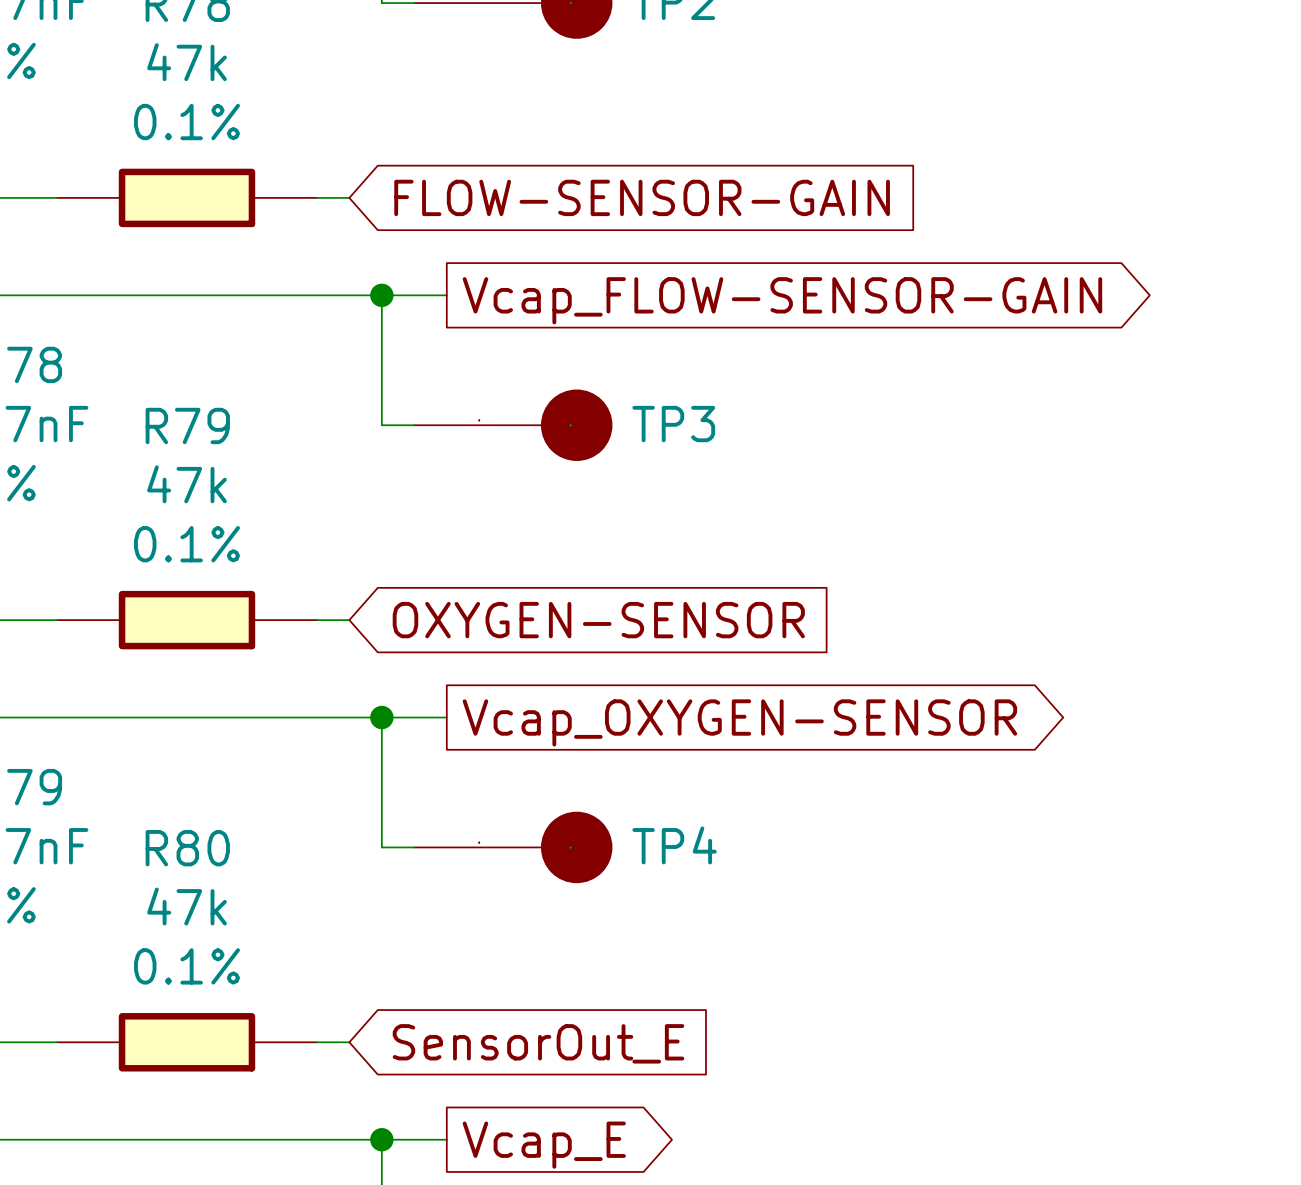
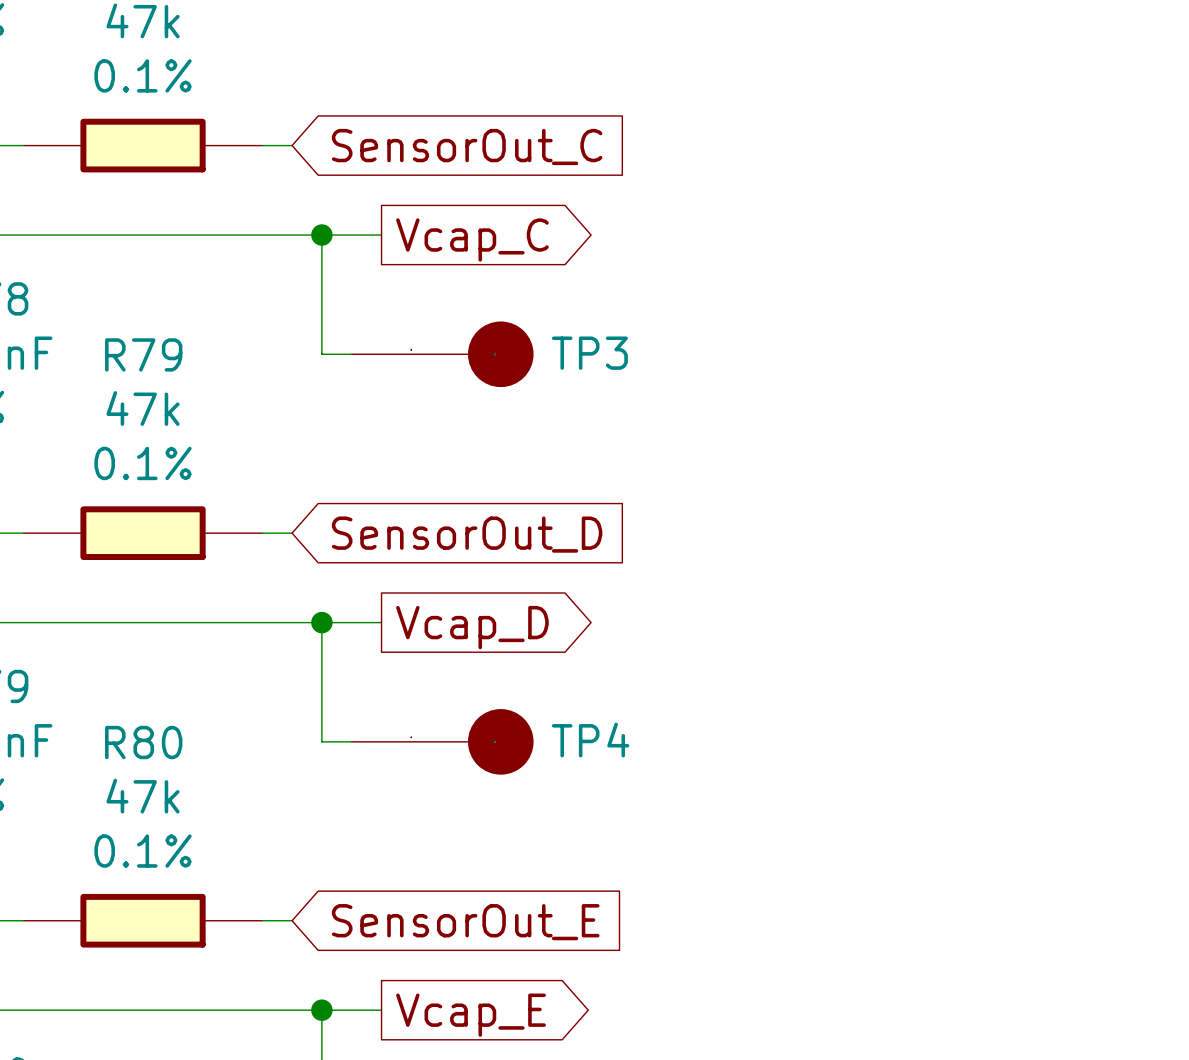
global label: FLOW-SENSOR-GAIN (642, 197) -> SensorOut_C (467, 147)
global label: Vcap_FLOW-SENSOR-GAIN (782, 300) -> Vcap_C (472, 239)
global label: OXYGEN-SENSOR (598, 620) -> SensorOut_D (467, 534)
global label: Vcap_OXYGEN-SENSOR (739, 722) -> Vcap_D (472, 627)

